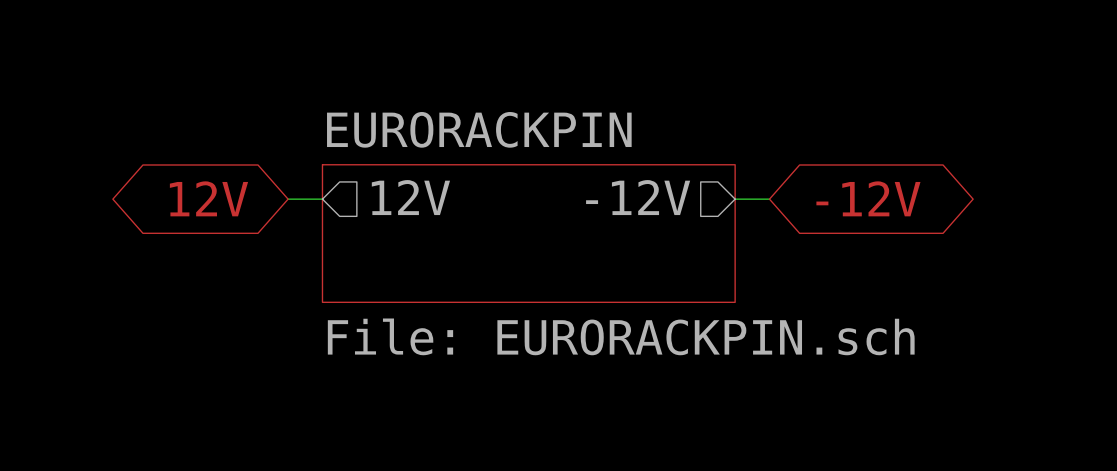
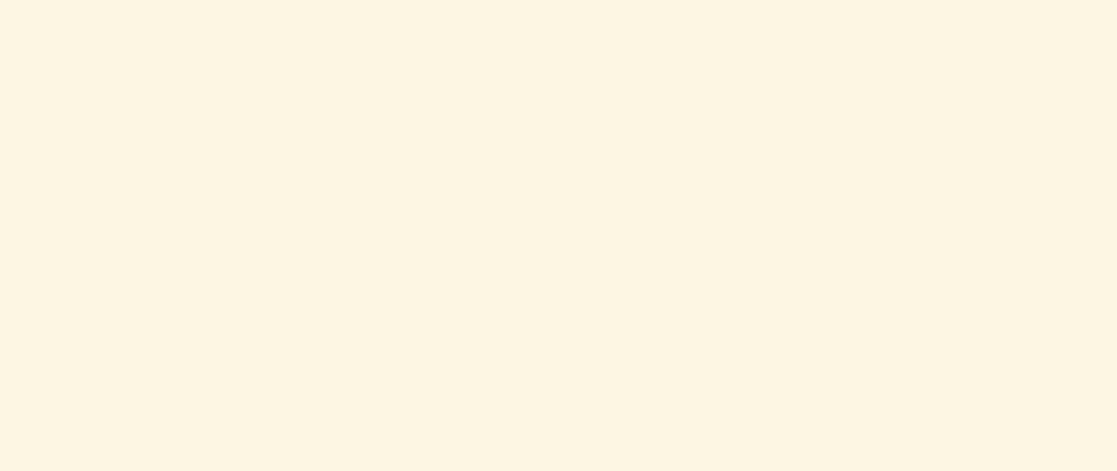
sheet pin: 12V (410, 197) -> none
sheet pin: -12V (638, 197) -> none
global label: 12V (208, 198) -> none
global label: -12V (868, 198) -> none
wire: (288, 199) (322, 199) -> none
wire: (735, 199) (769, 199) -> none
sheet EURORACKPIN: File: EURORACKPIN.sch (528, 233) -> none

